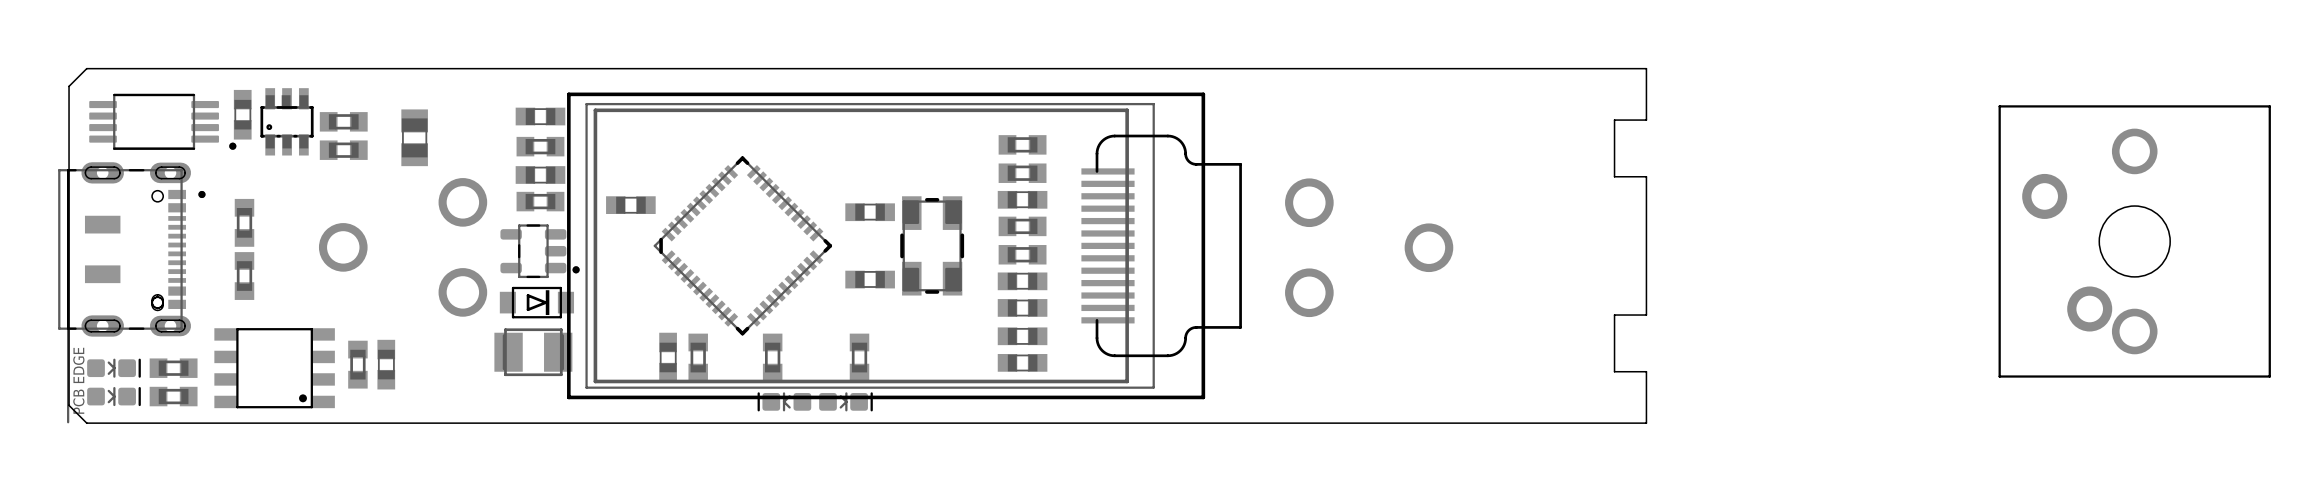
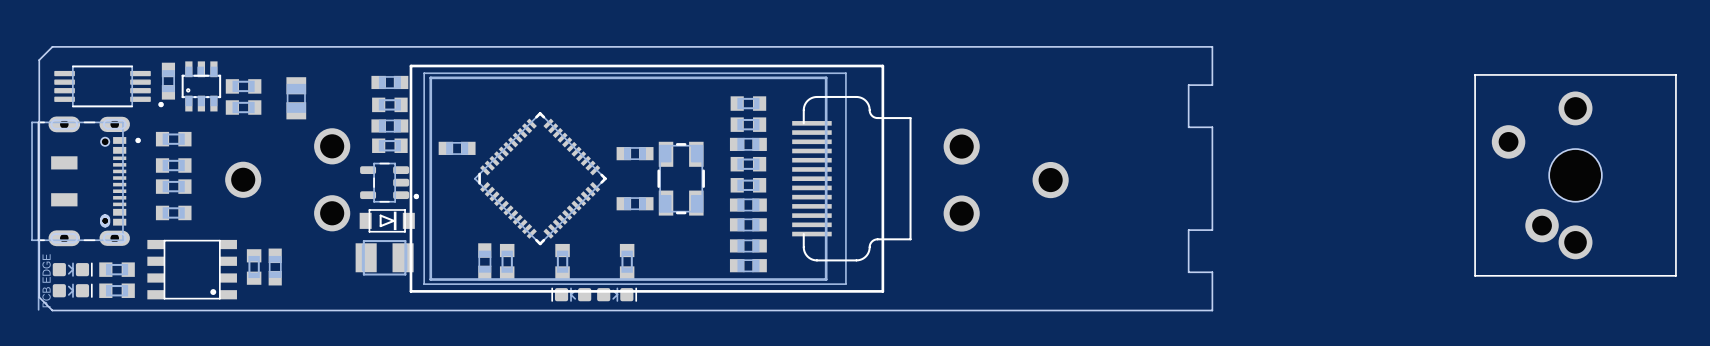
part: none -> (173, 139)
part rotation: 0° (244, 222) -> 90° clockwise (173, 165)
part: none -> (173, 186)
part: (244, 276) -> none
part: none -> (173, 212)

